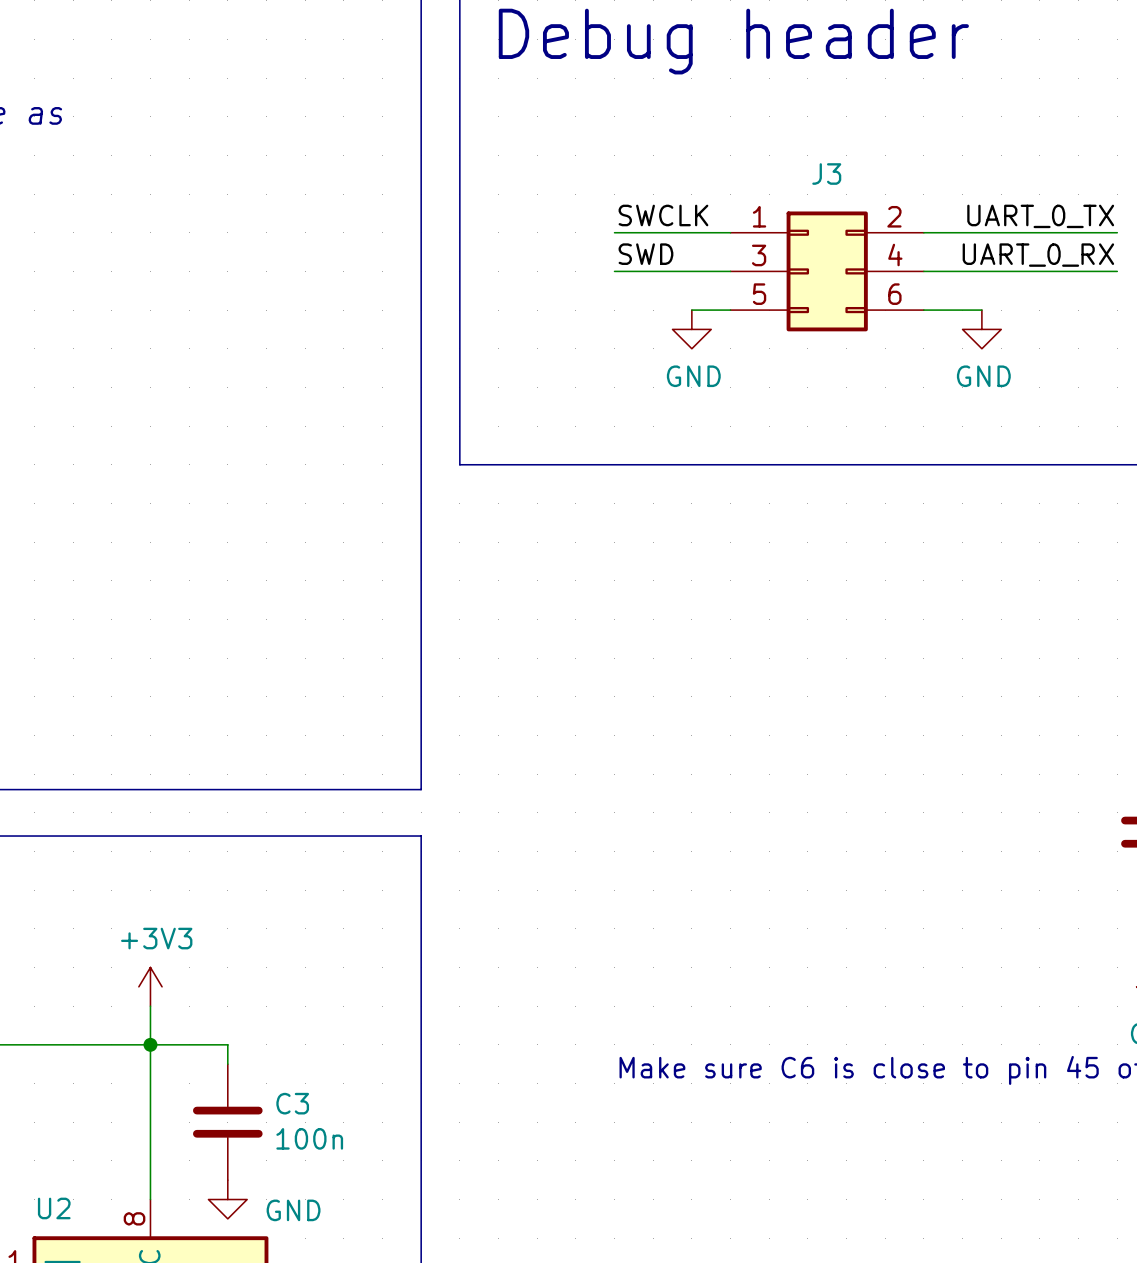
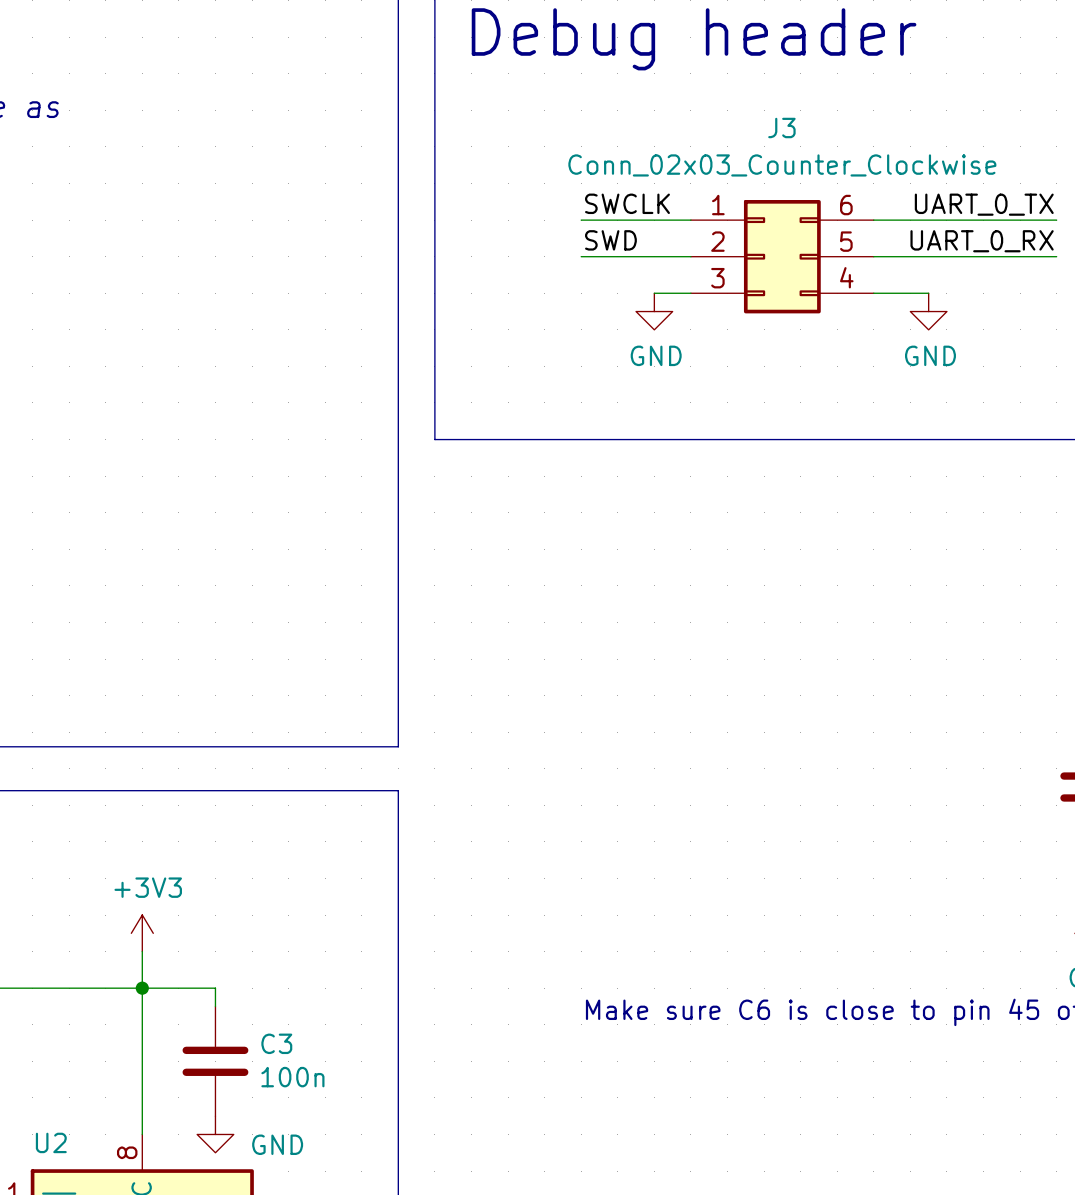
J3 name position: J3 (826, 174) -> J3 (781, 127)
J3 value: none -> Conn_02x03_Counter_Clockwise (782, 165)
J3 pin number: 2 (894, 216) -> 6 (846, 205)
J3 pin number: 3 (759, 255) -> 2 (717, 241)
J3 pin number: 4 (895, 255) -> 5 (846, 241)
J3 pin number: 5 (759, 294) -> 3 (717, 278)
J3 pin number: 6 (894, 294) -> 4 (846, 277)

